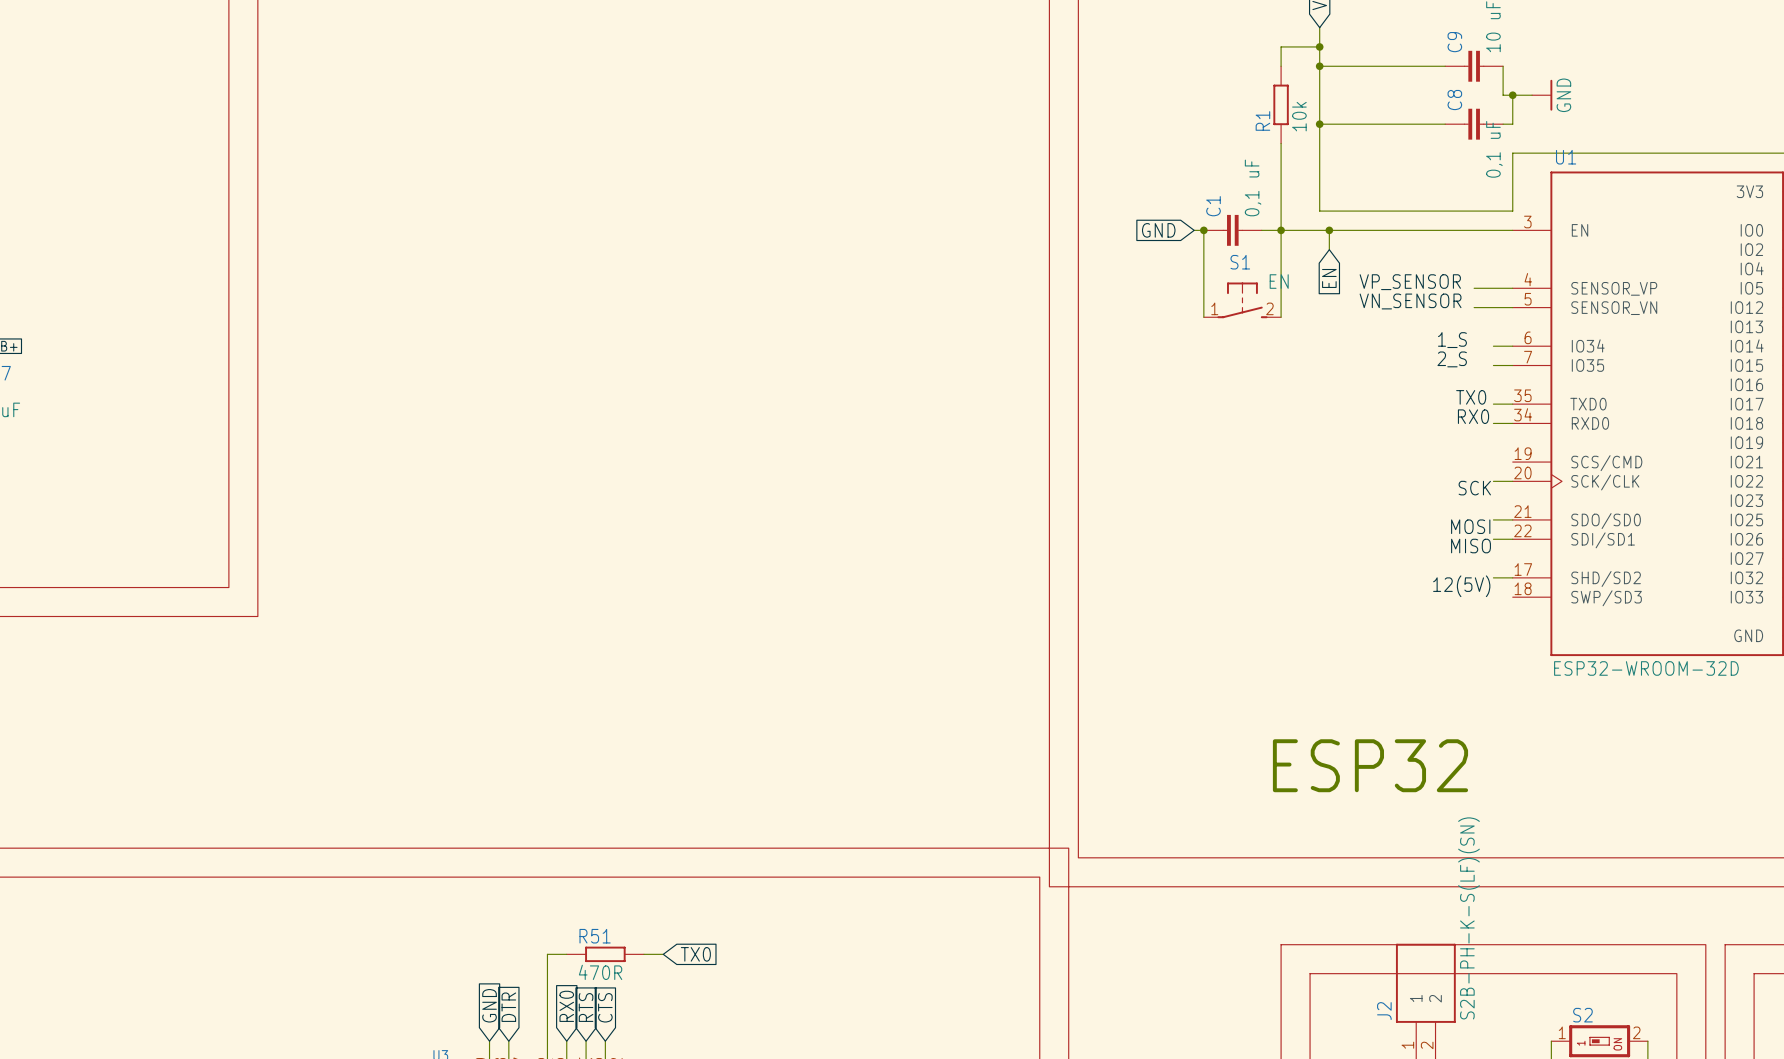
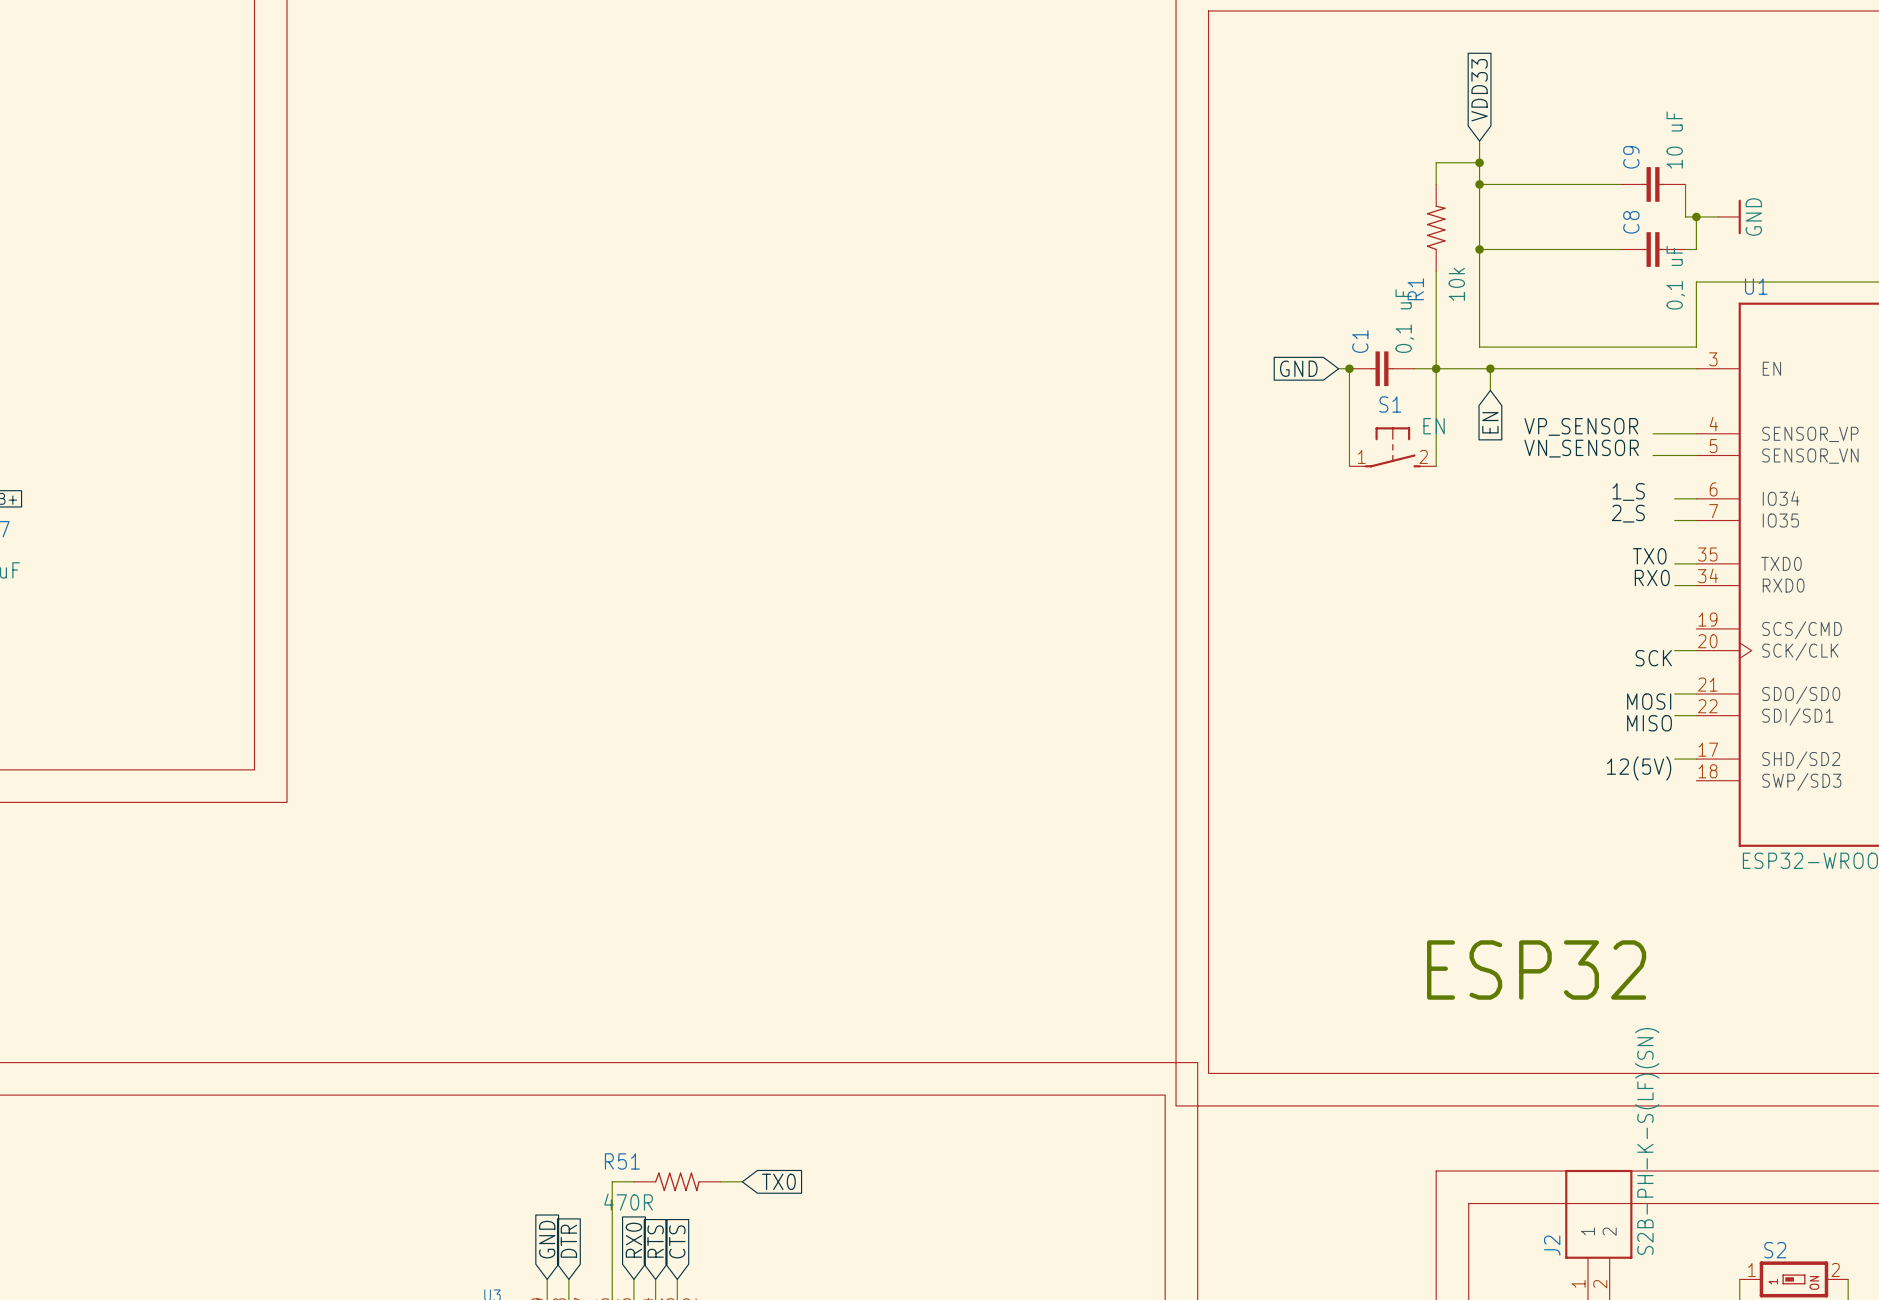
R1 symbol: [1273, 66, 1289, 144] -> [1426, 184, 1446, 272]
R1 value position: 10k (1299, 116) -> 10k (1456, 284)
R1 name position: R1 (1262, 120) -> R1 (1415, 289)
R51 name position: R51 (595, 936) -> R51 (622, 1161)
R51 symbol: [566, 946, 644, 963] -> [633, 1172, 721, 1192]
R51 value position: 470R (600, 972) -> 470R (628, 1202)

